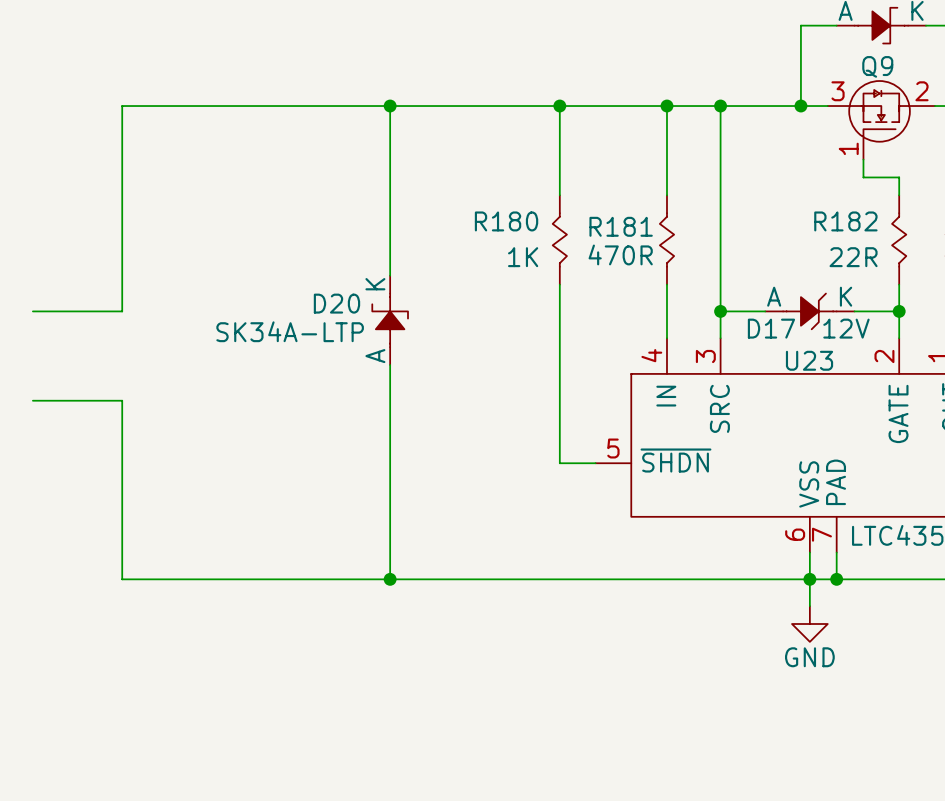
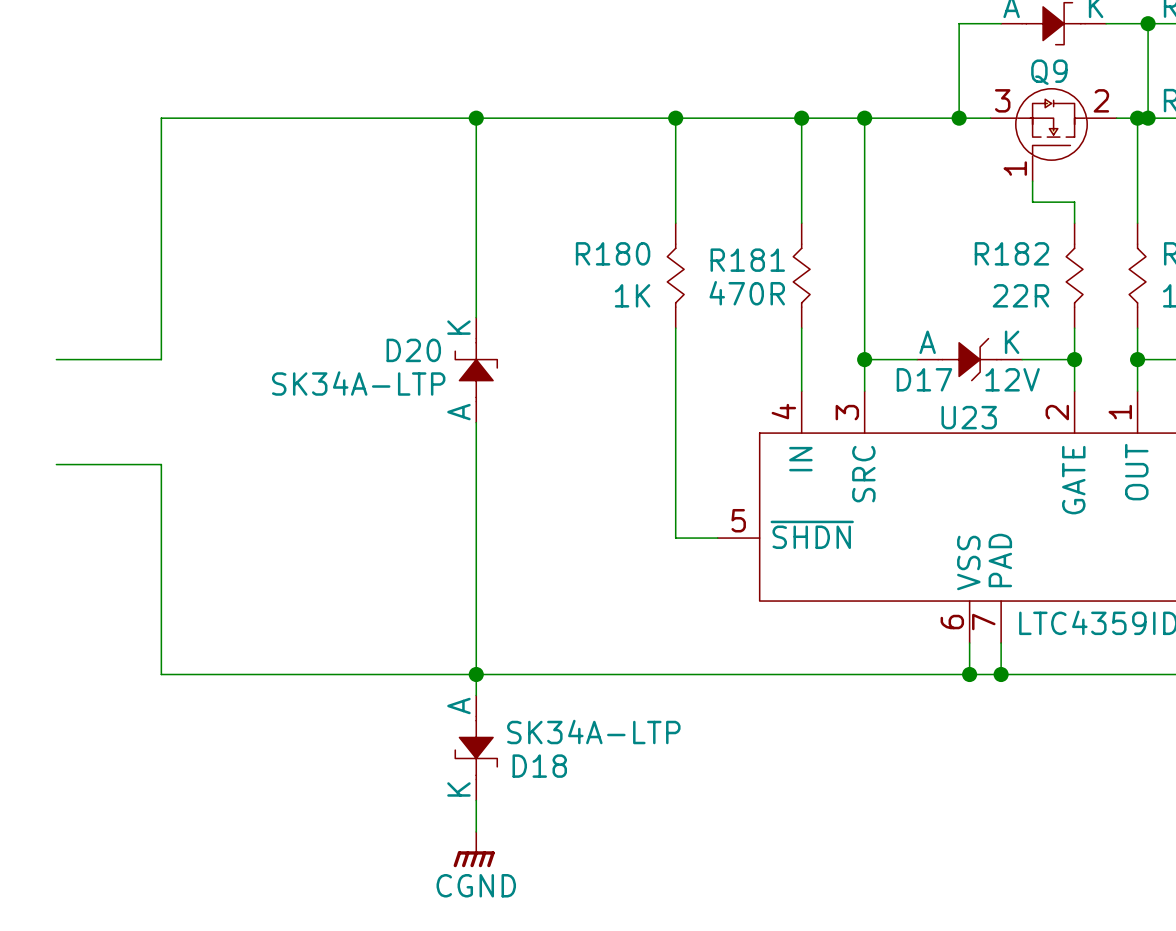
wire: none -> (476, 674) (476, 695)
wire: (809, 579) (809, 606) -> none
power symbol: GND (809, 624) -> none
D18: none -> SK34A-LTP (476, 747)
wire: none -> (476, 800) (476, 831)
power symbol: none -> CGND (474, 849)

